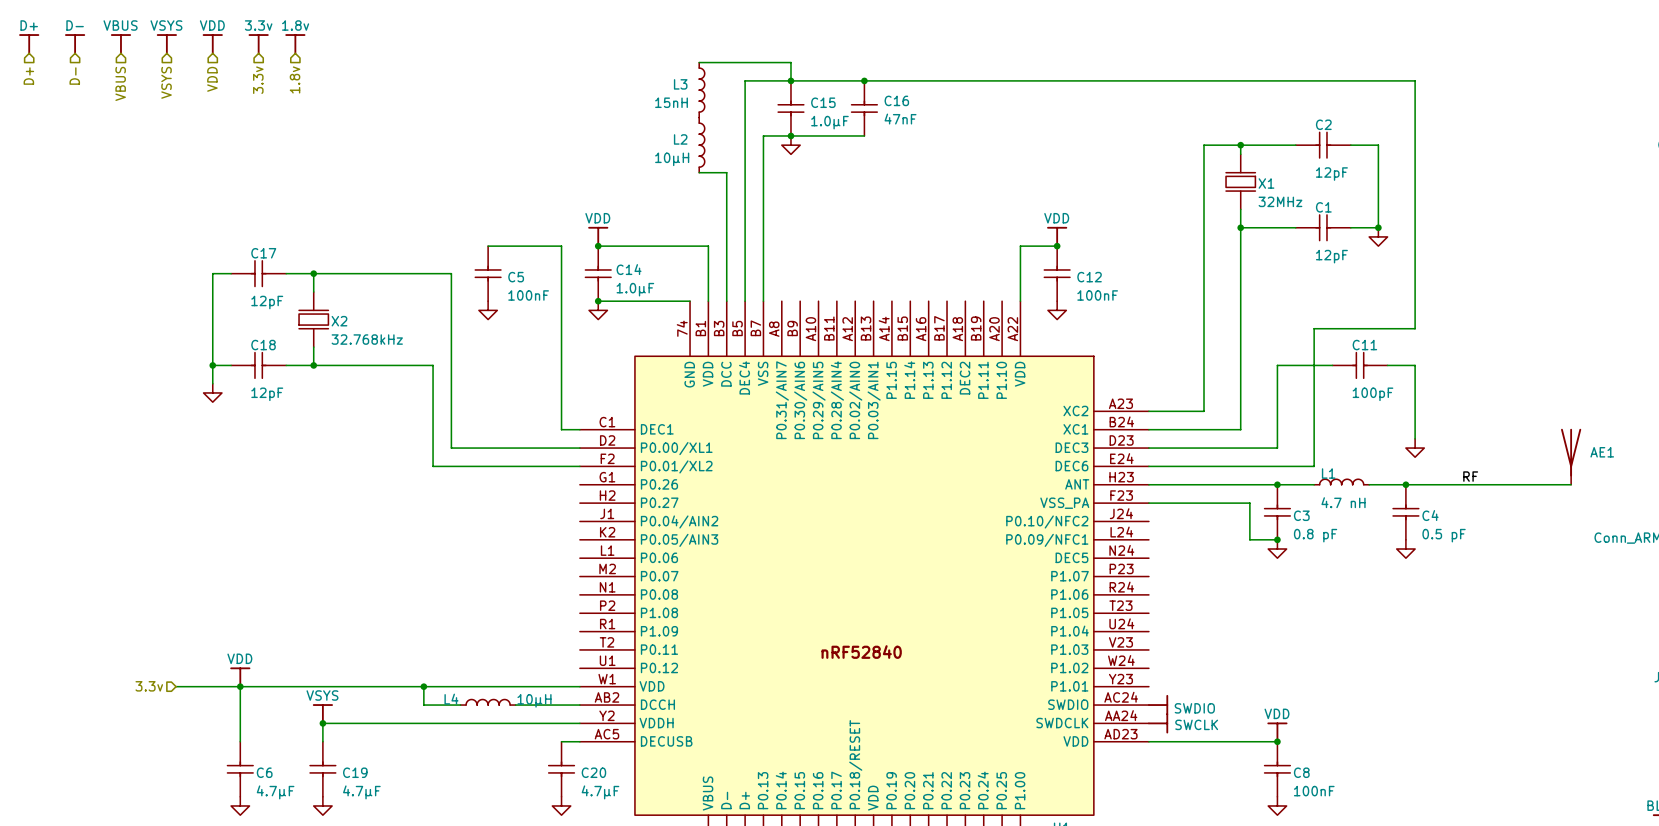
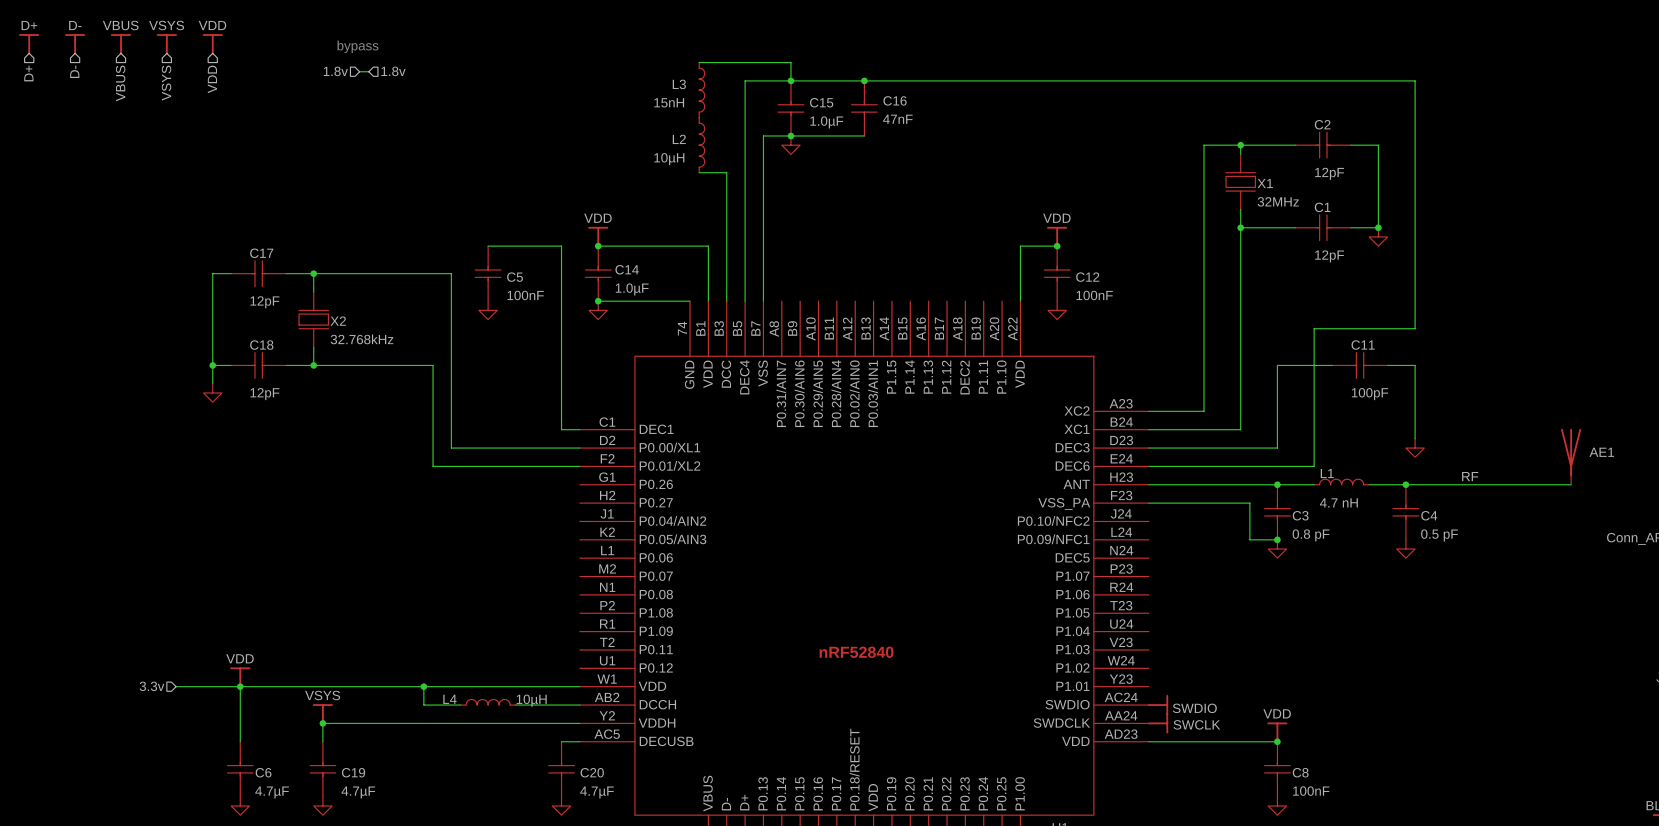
power symbol: 3.3v (258, 44) -> none
power symbol: 1.8v (295, 44) -> none
text: none -> bypass (357, 46)
hierarchical label: none -> 1.8v (335, 71)
wire: none -> (359, 71) (368, 71)
hierarchical label: none -> 1.8v (393, 71)
hierarchical label: 1.8v (295, 79) -> none
hierarchical label: 3.3v (258, 80) -> none

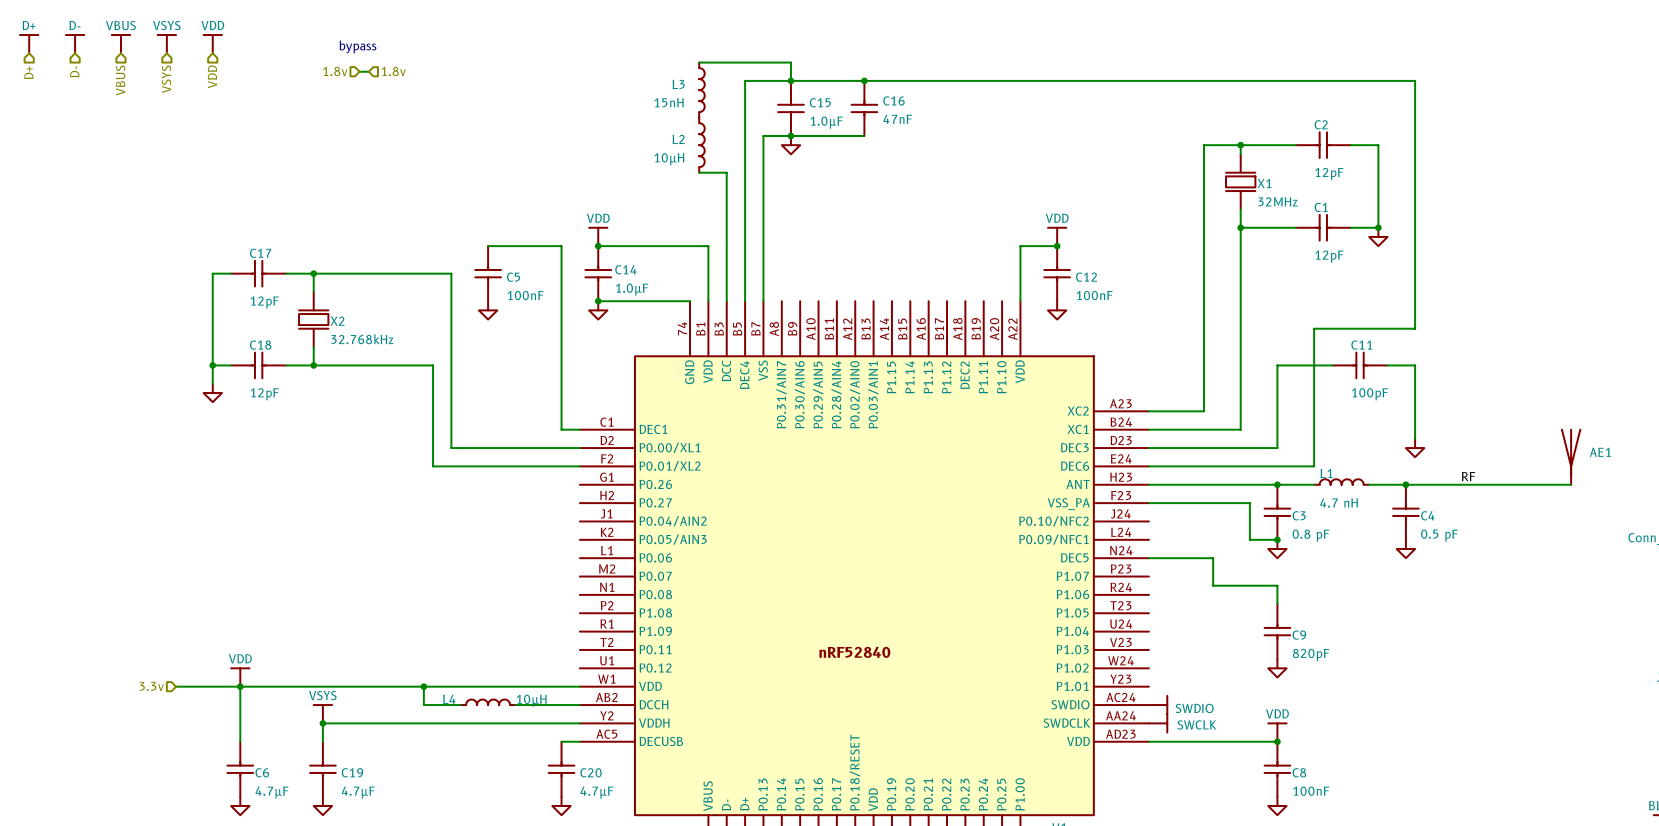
wire: none -> (1148, 558) (1213, 558) (1213, 585) (1277, 585) (1277, 604)
C9: none -> 820pF (1277, 631)
power symbol: none -> (1277, 668)

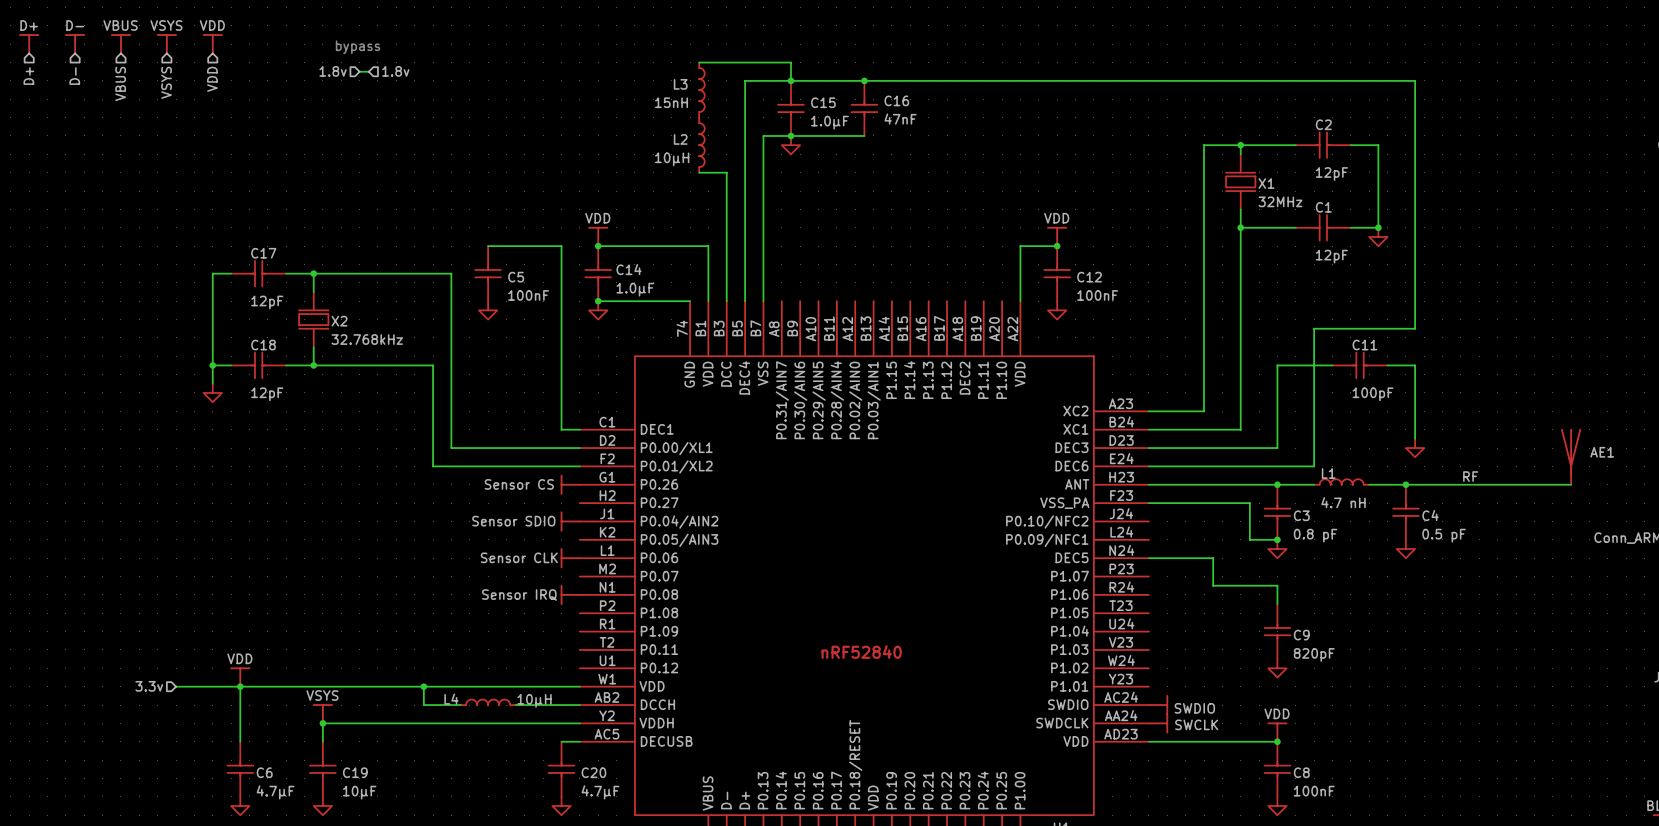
power symbol: none -> Sensor CS (570, 484)
power symbol: none -> Sensor SDIO (570, 521)
power symbol: none -> Sensor CLK (570, 558)
power symbol: none -> Sensor IRQ (570, 594)
C19 value: 4.7µF (358, 792) -> 10µF (359, 792)

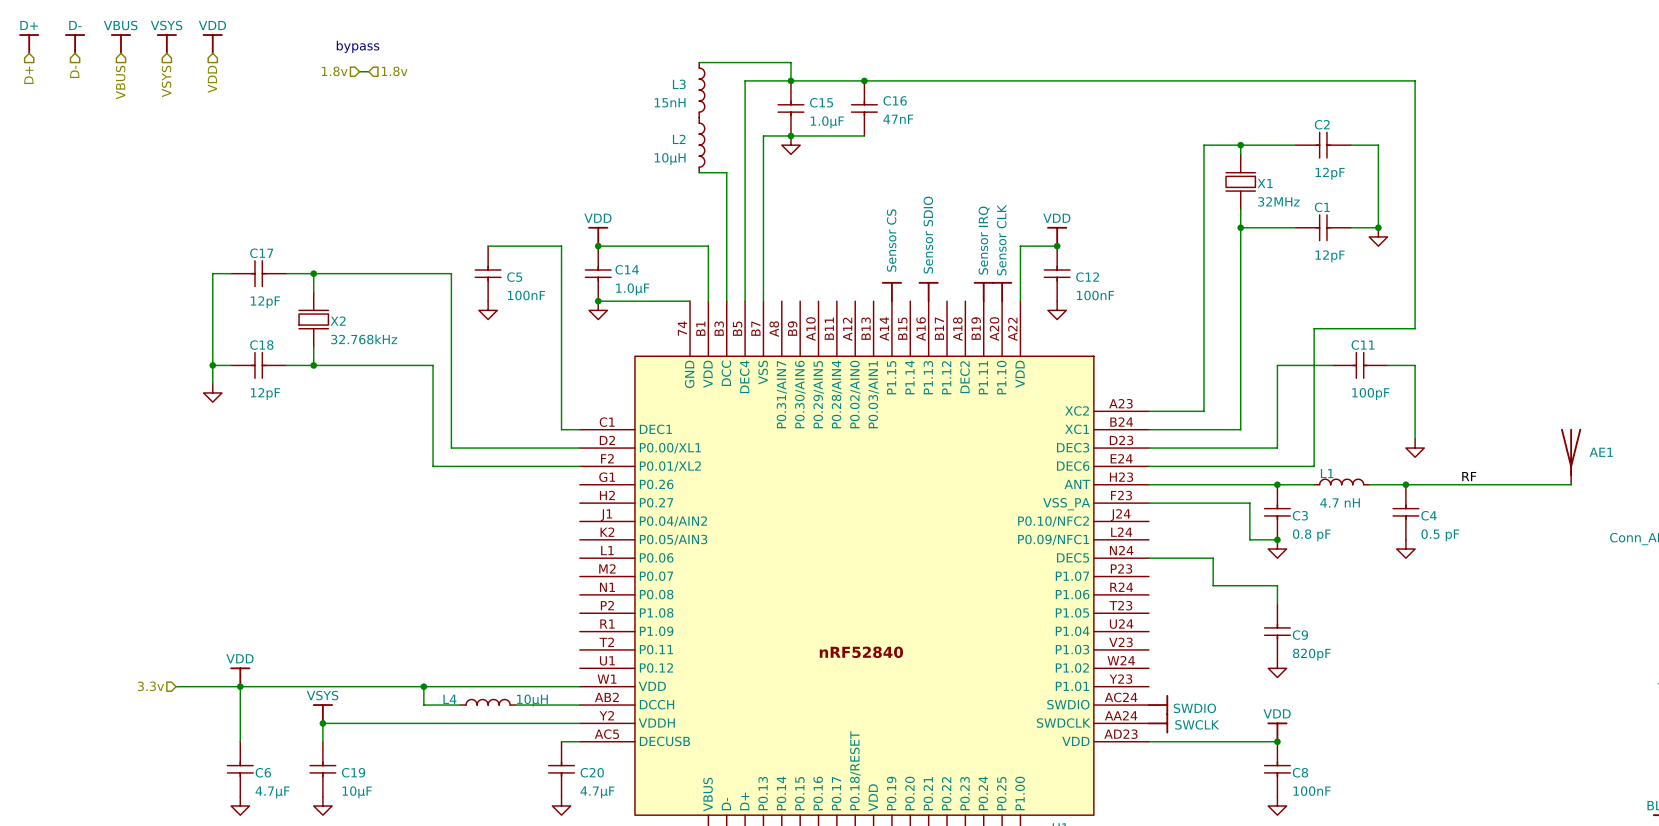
power symbol: none -> Sensor CS (891, 292)
power symbol: none -> Sensor SDIO (928, 292)
power symbol: none -> Sensor IRQ (983, 292)
power symbol: none -> Sensor CLK (1002, 292)
power symbol: Sensor CS (570, 484) -> none
power symbol: Sensor SDIO (570, 521) -> none
power symbol: Sensor CLK (570, 558) -> none
power symbol: Sensor IRQ (570, 594) -> none

